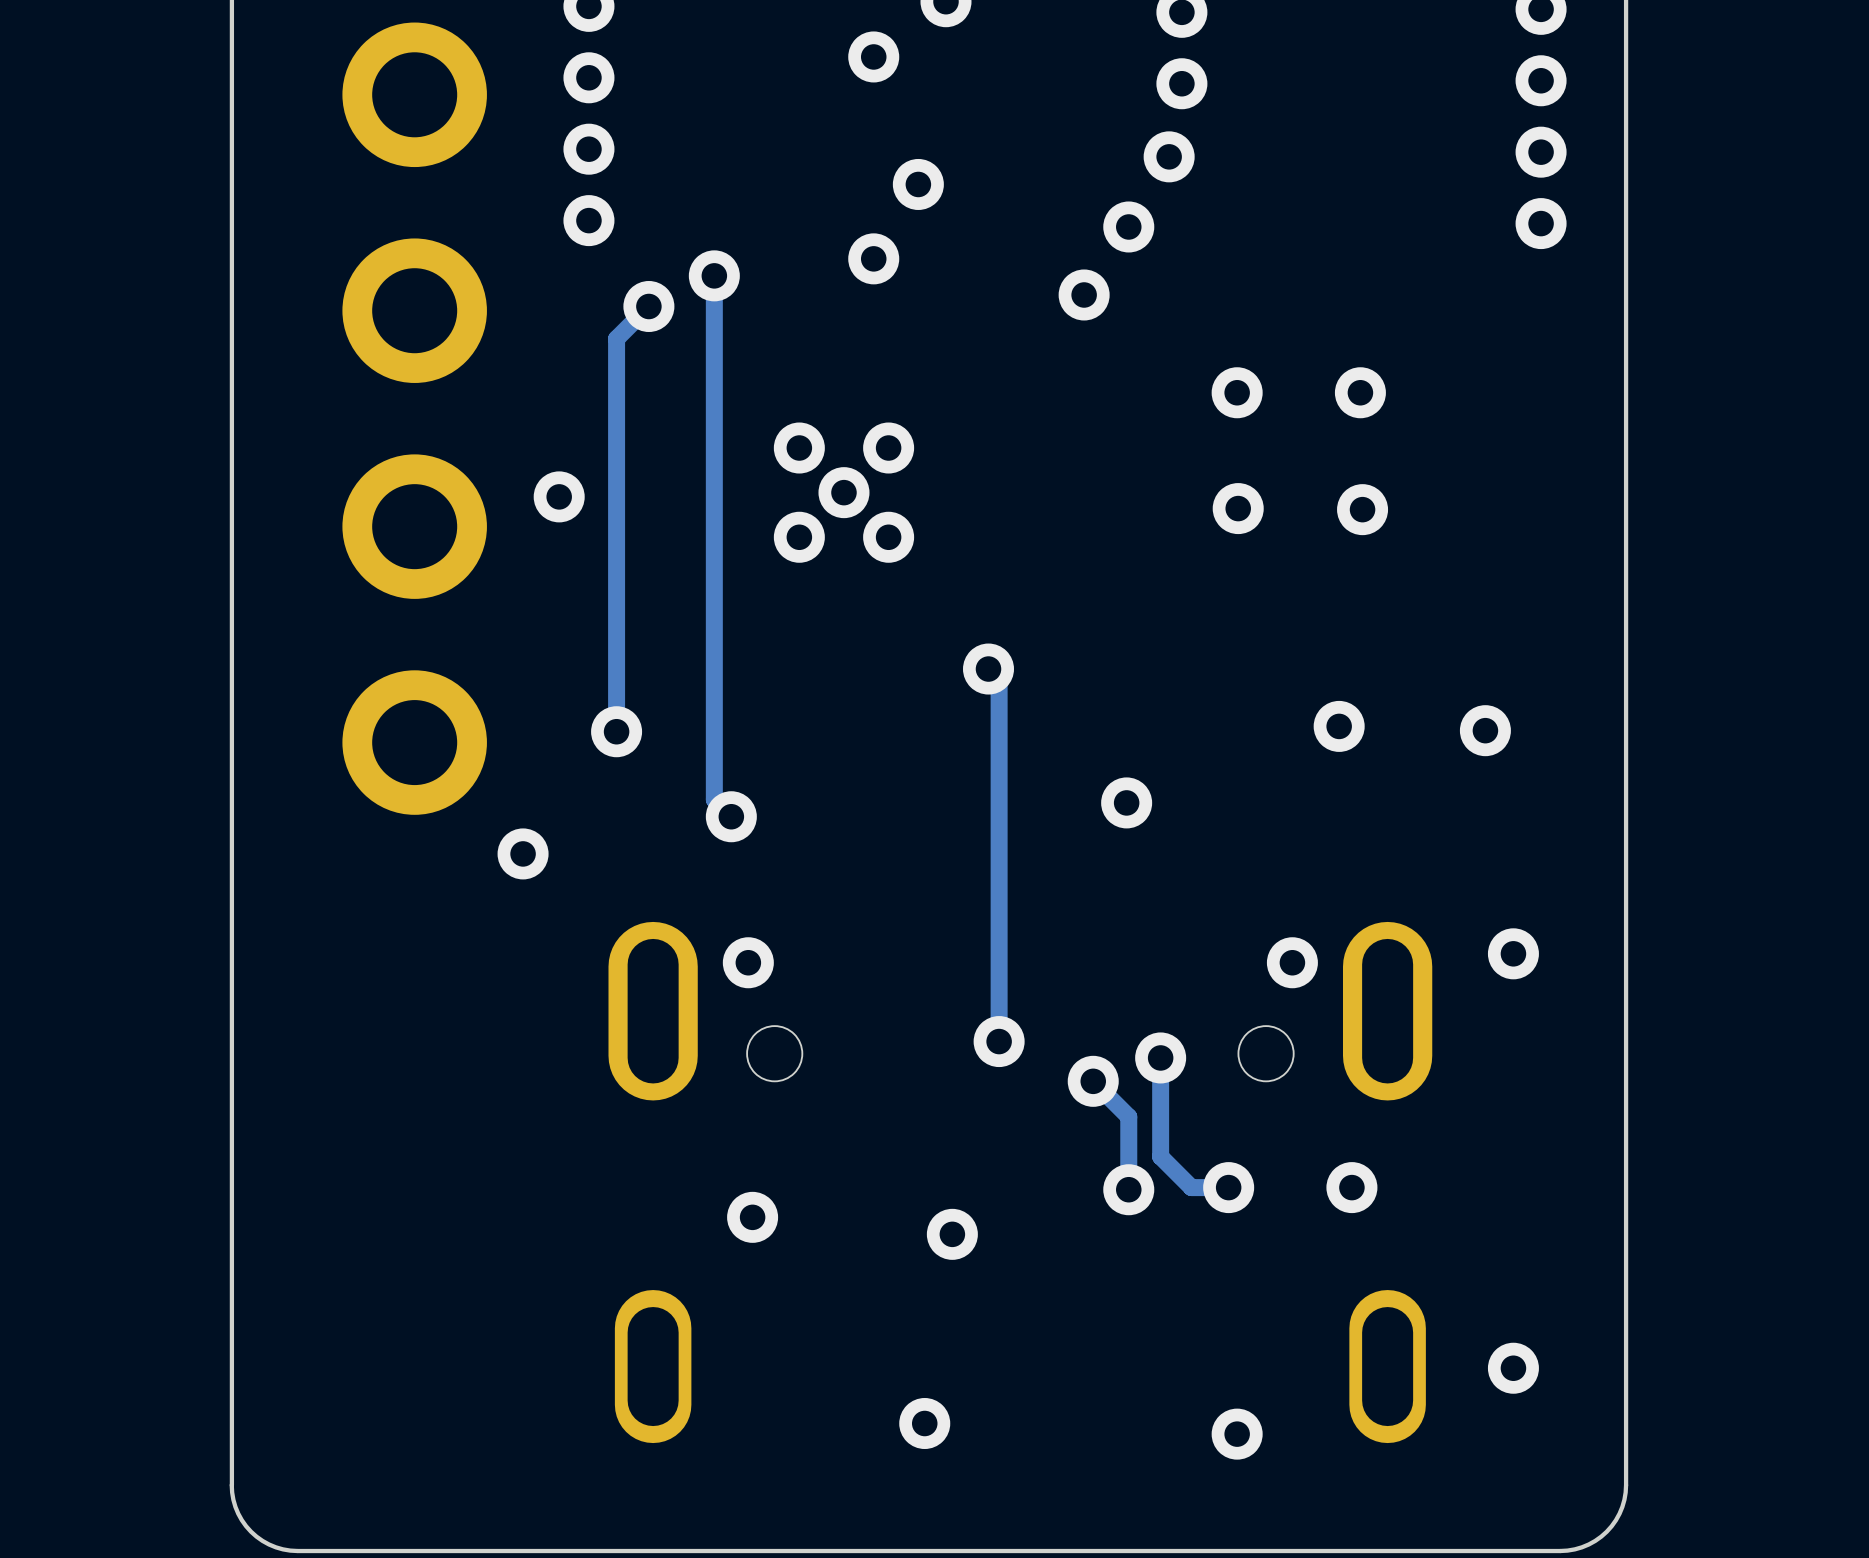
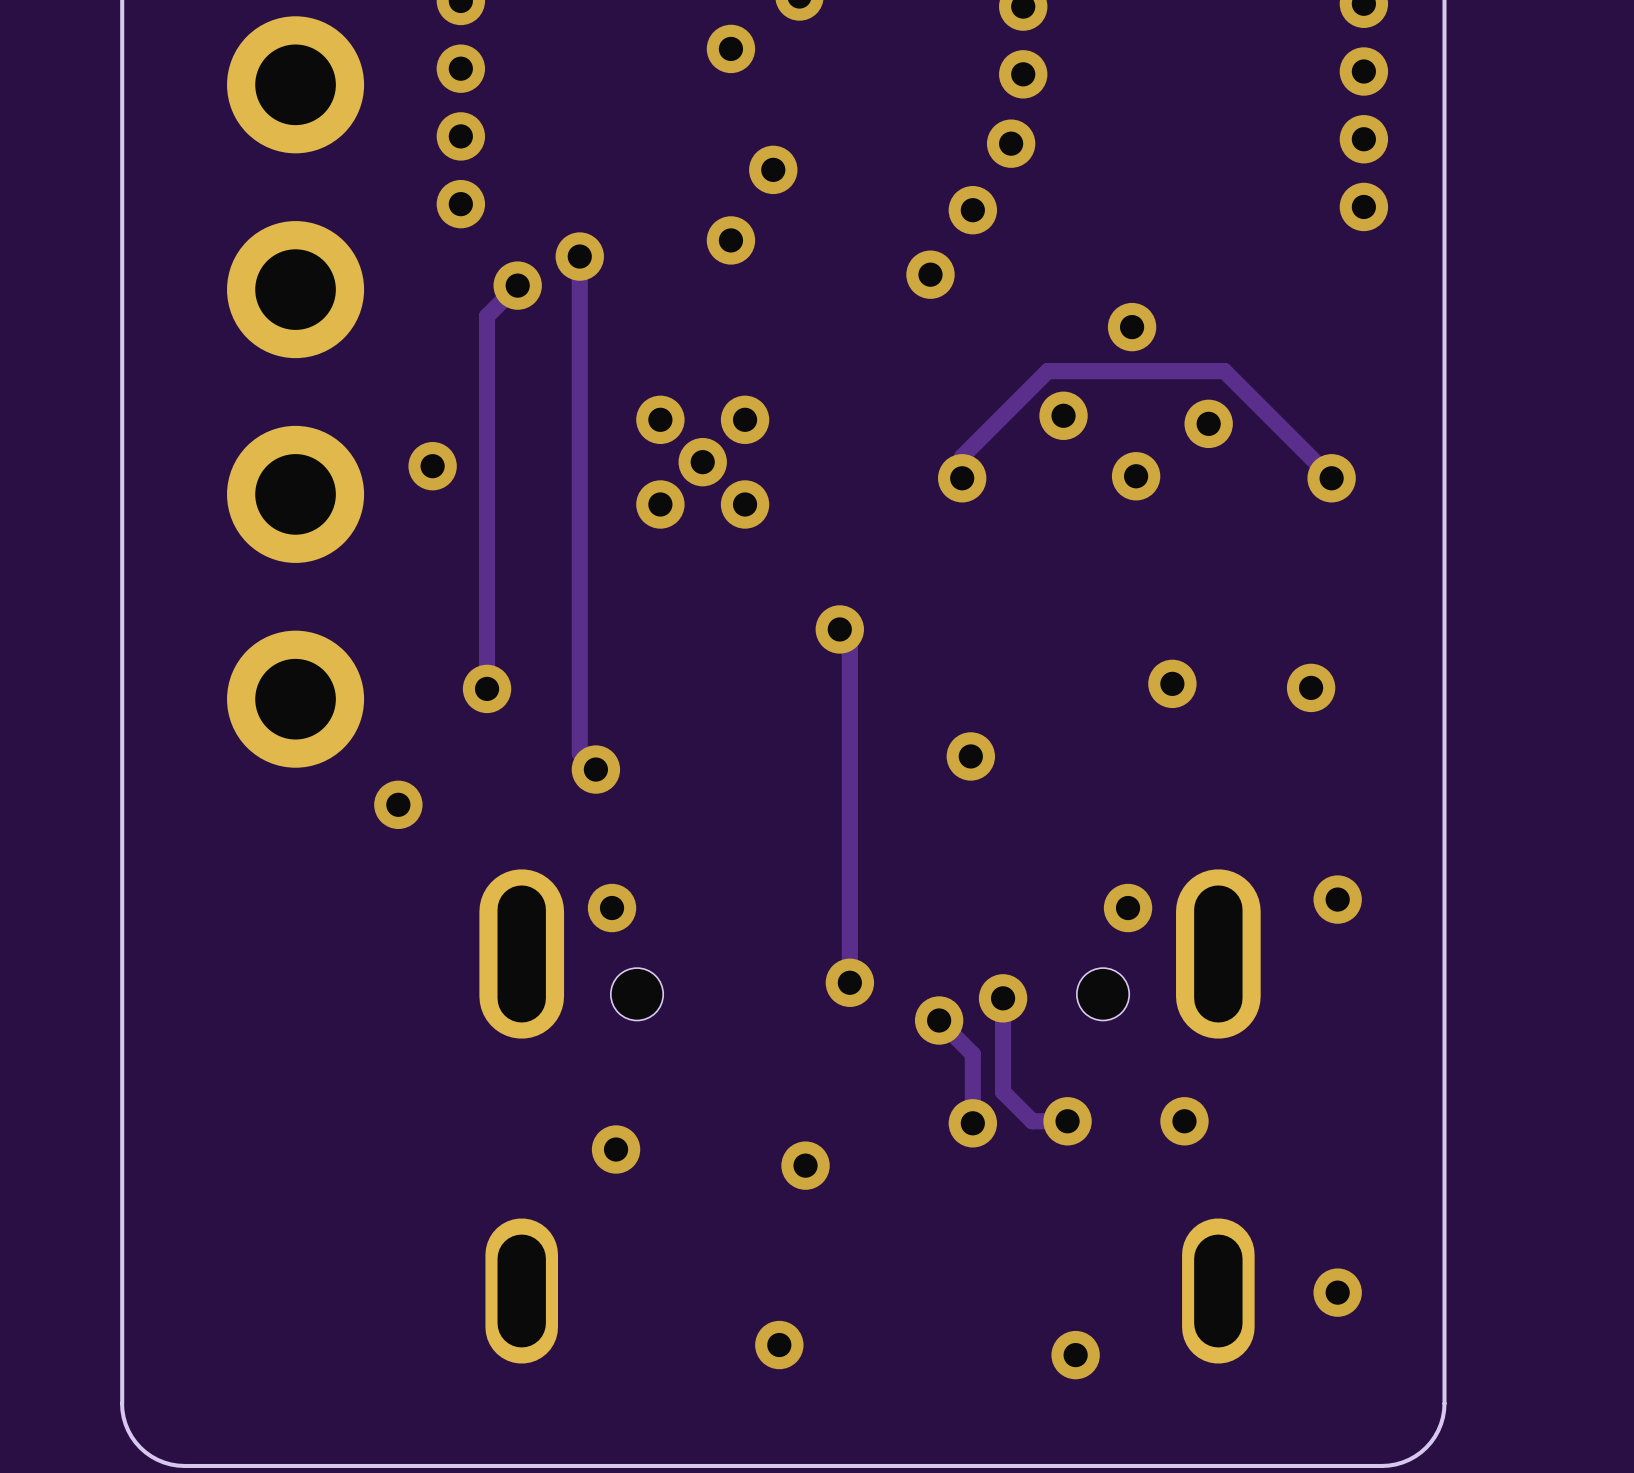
via: none -> (1132, 327)
via position: (1237, 392) -> (1063, 415)
via: (1360, 392) -> none
via: none -> (1208, 423)
via: none -> (1136, 476)
via: (1238, 508) -> none
via: none -> (962, 478)
via: (1362, 509) -> none
track: none -> (1331, 478) (1224, 371) (1047, 371) (962, 456) (962, 478)
via: none -> (1331, 478)

